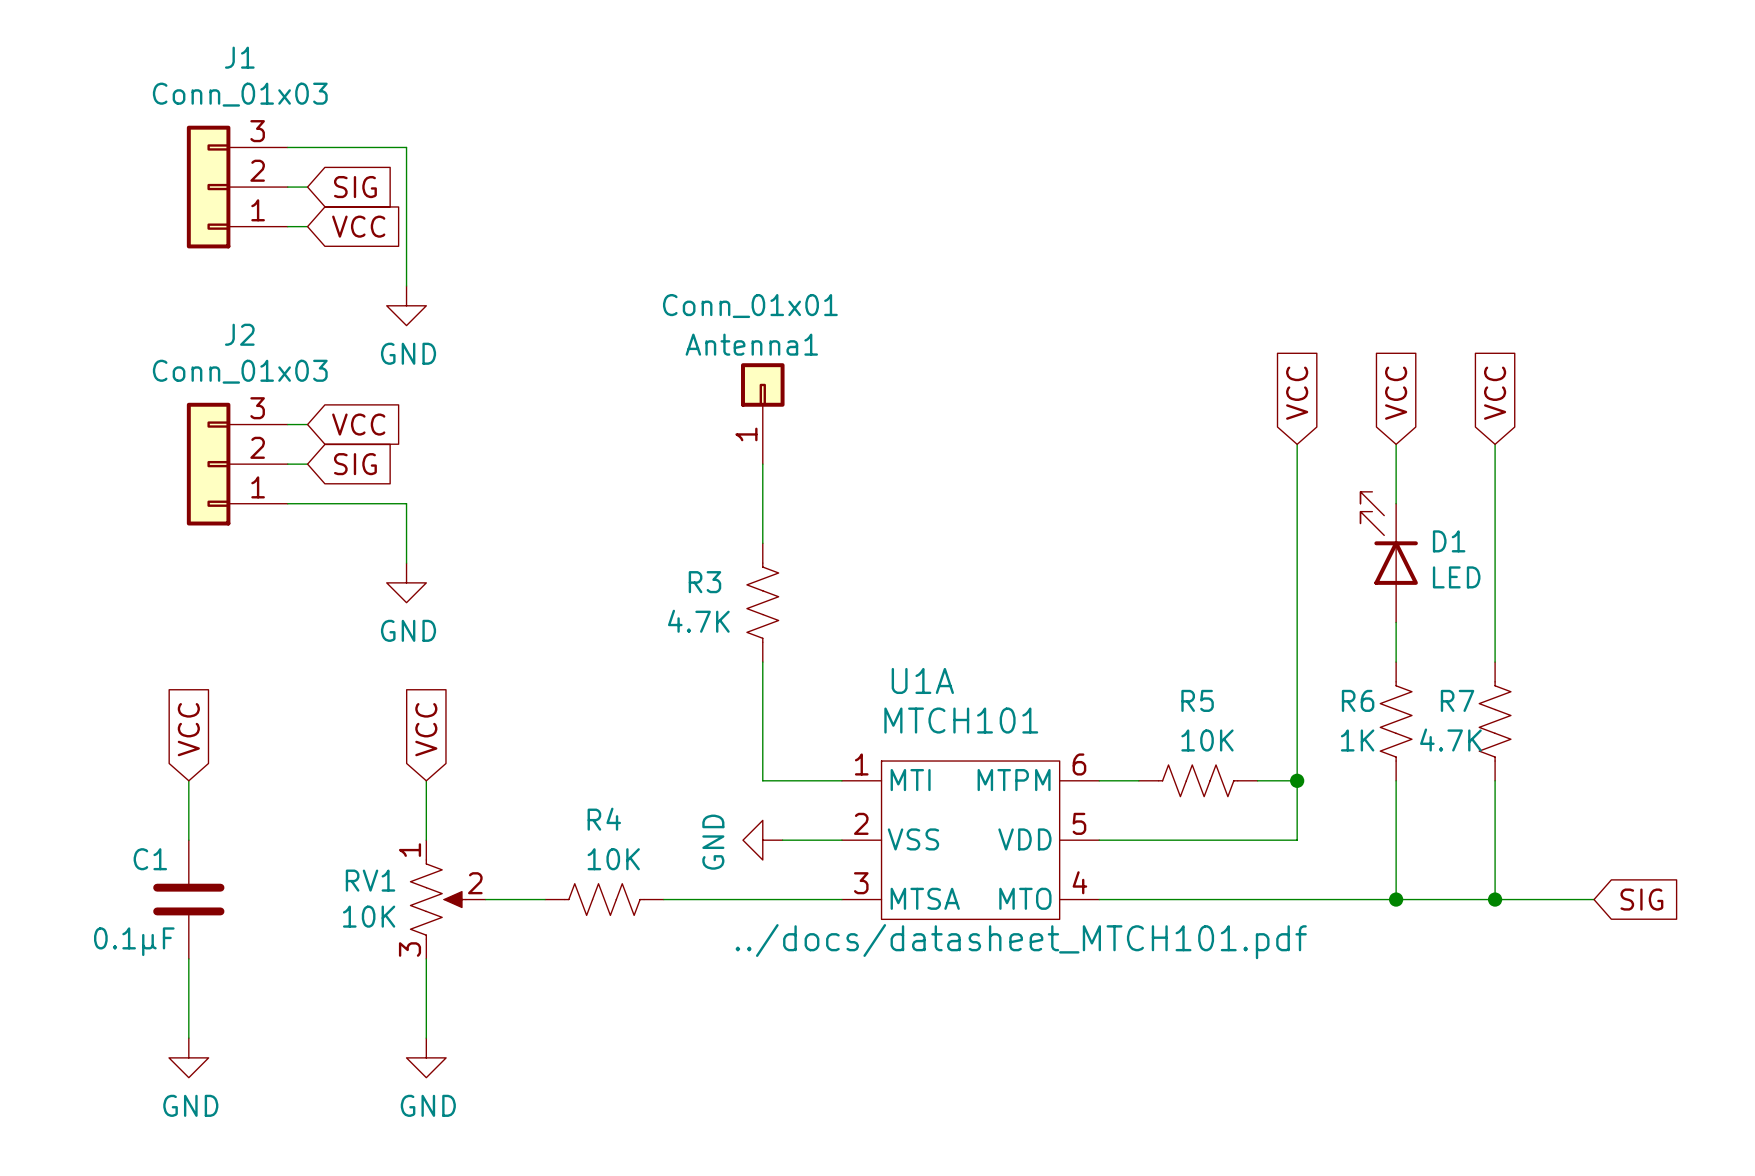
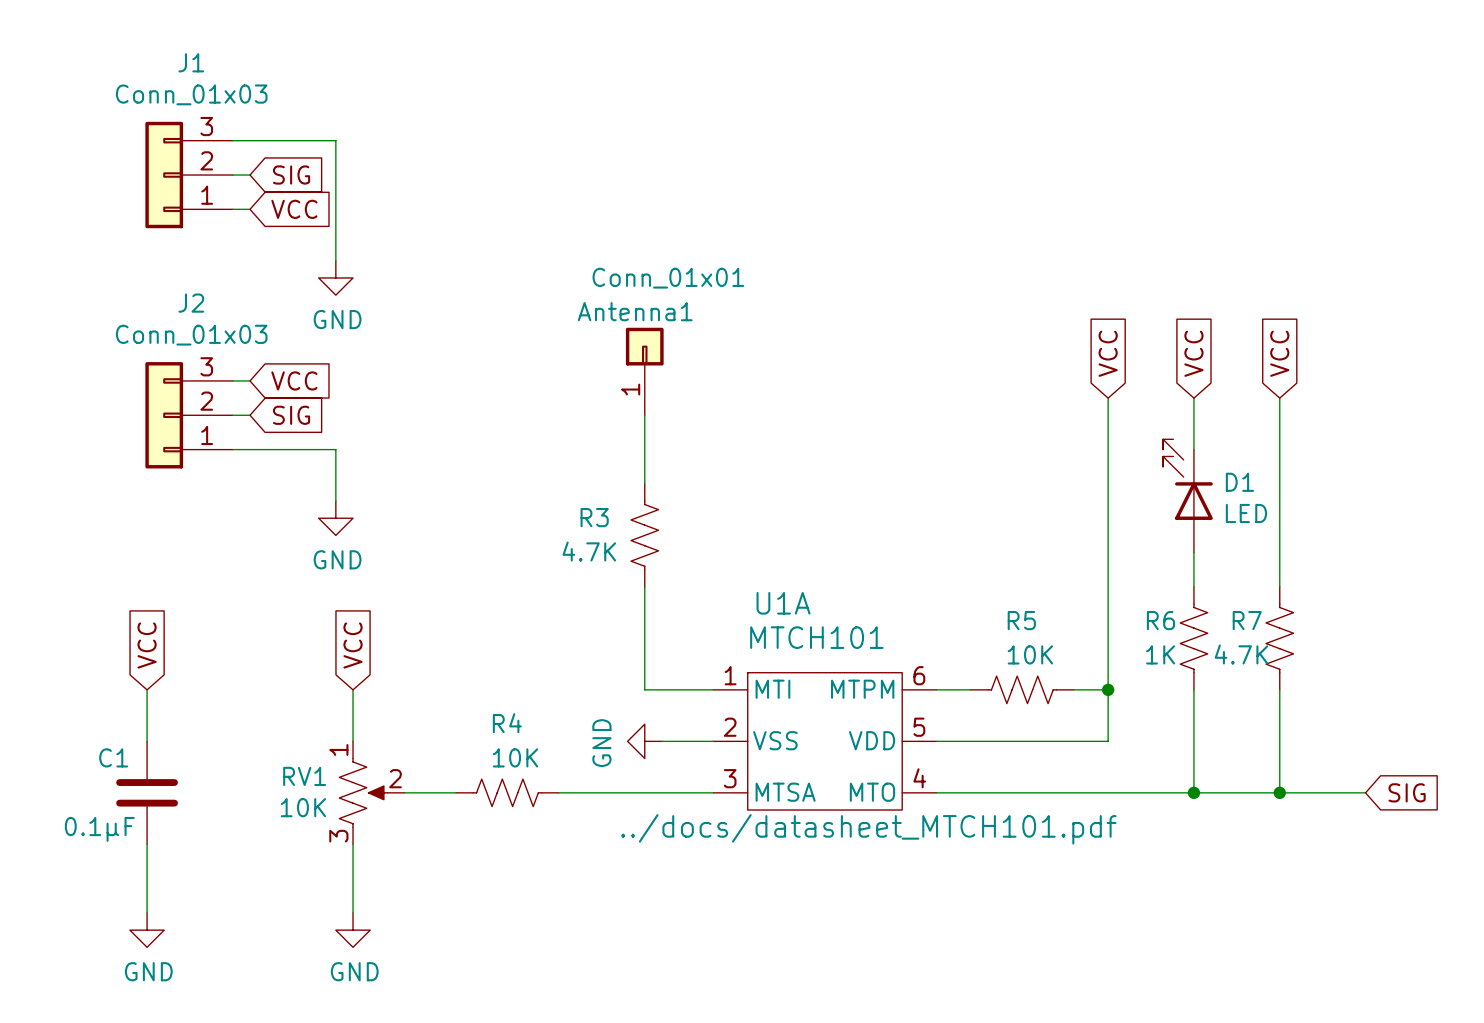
Antenna1 value position: Conn_01x01 (750, 306) -> Conn_01x01 (668, 278)

